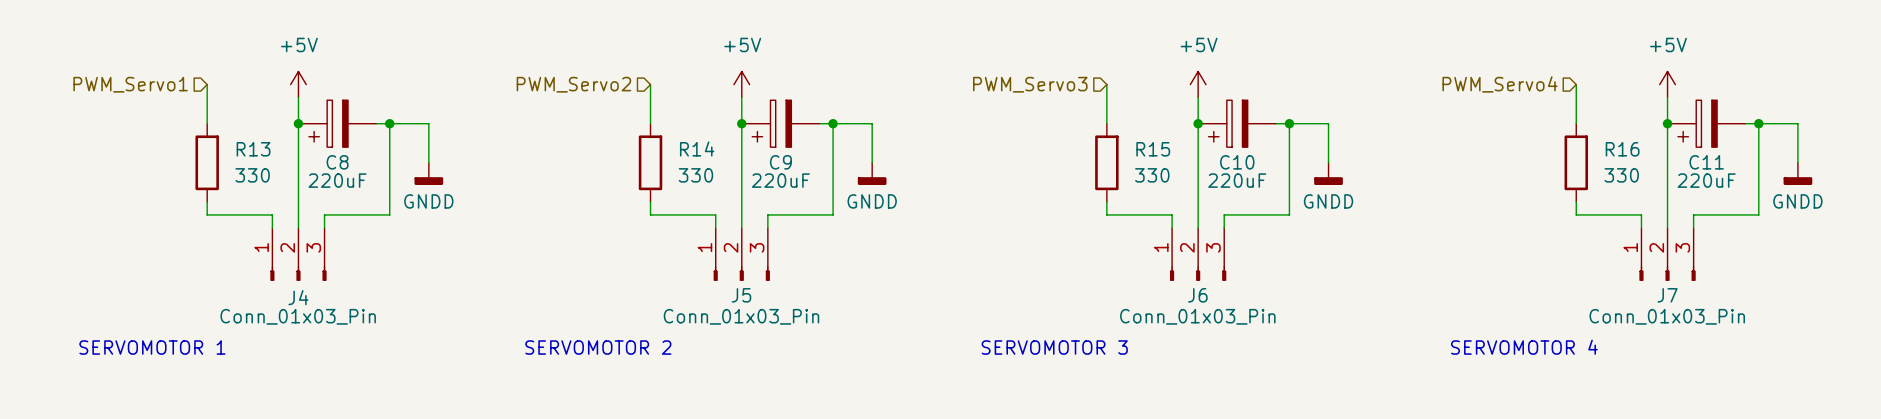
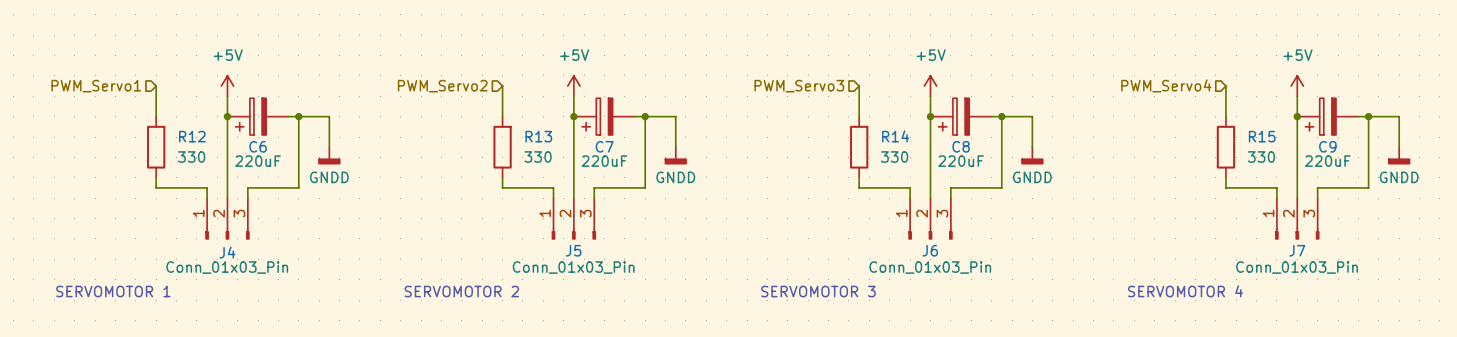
R14 name: R14 (697, 148) -> R13 (538, 136)
R13 name: R13 (253, 149) -> R12 (192, 136)
R15 name: R15 (1153, 149) -> R14 (895, 136)
R16 name: R16 (1622, 149) -> R15 (1262, 136)
C8 name: C8 (337, 162) -> C6 (258, 146)
C9 name: C9 (780, 162) -> C7 (604, 146)
C10 name: C10 (1237, 162) -> C8 (961, 146)
C11 name: C11 (1706, 162) -> C9 (1327, 146)

